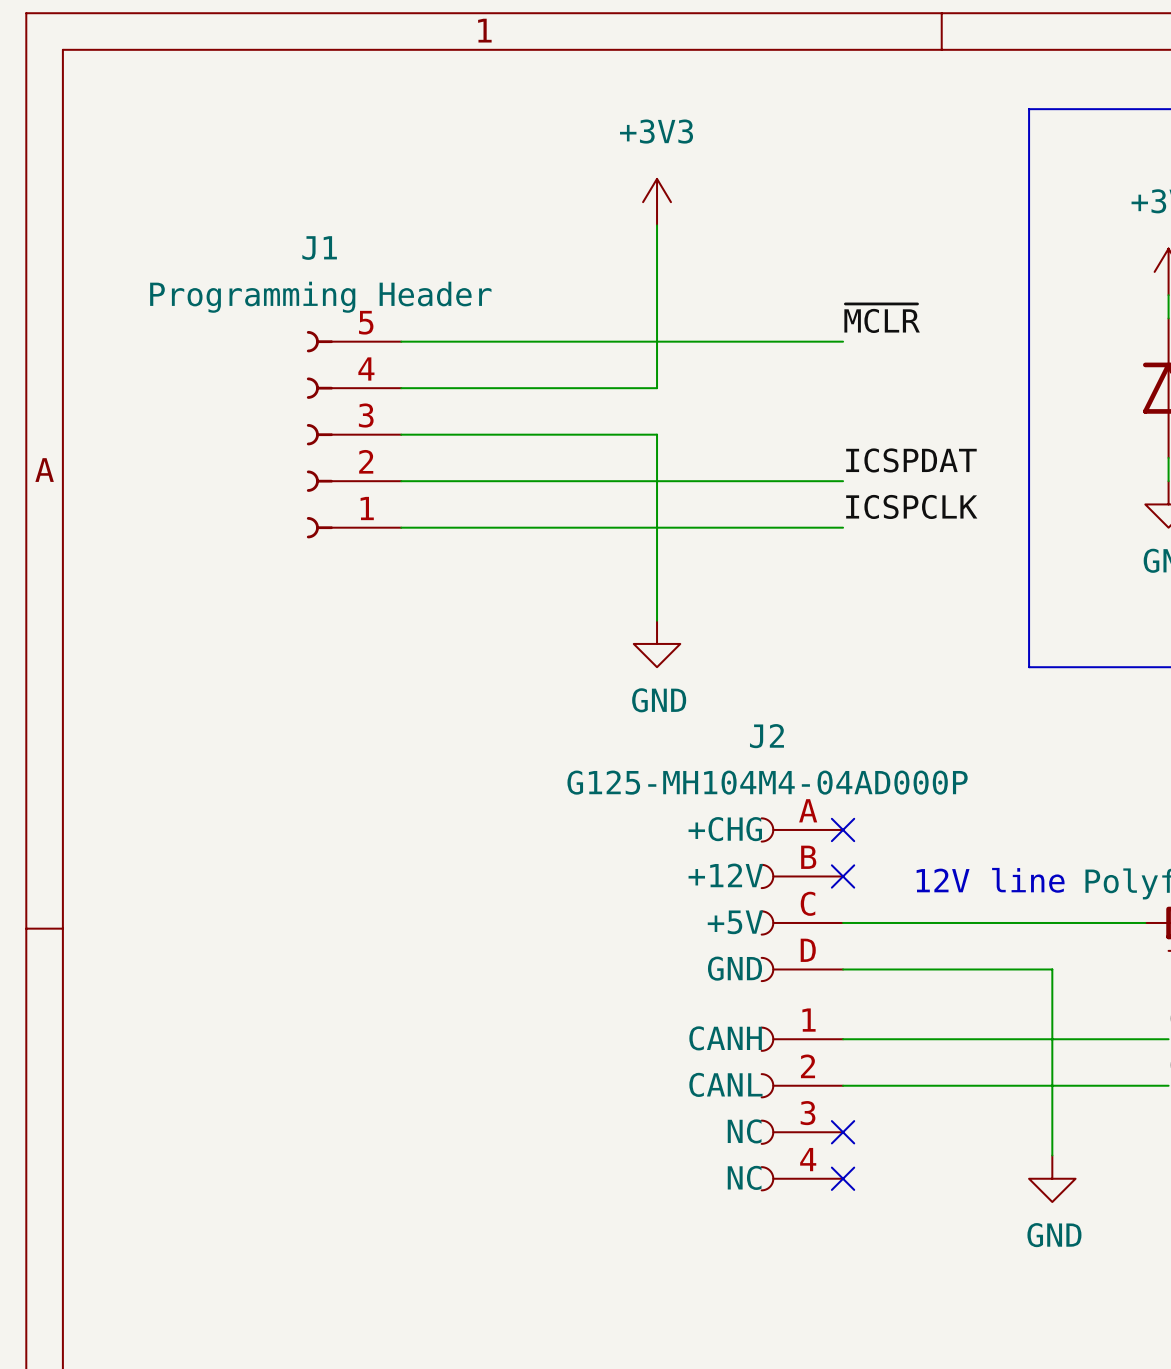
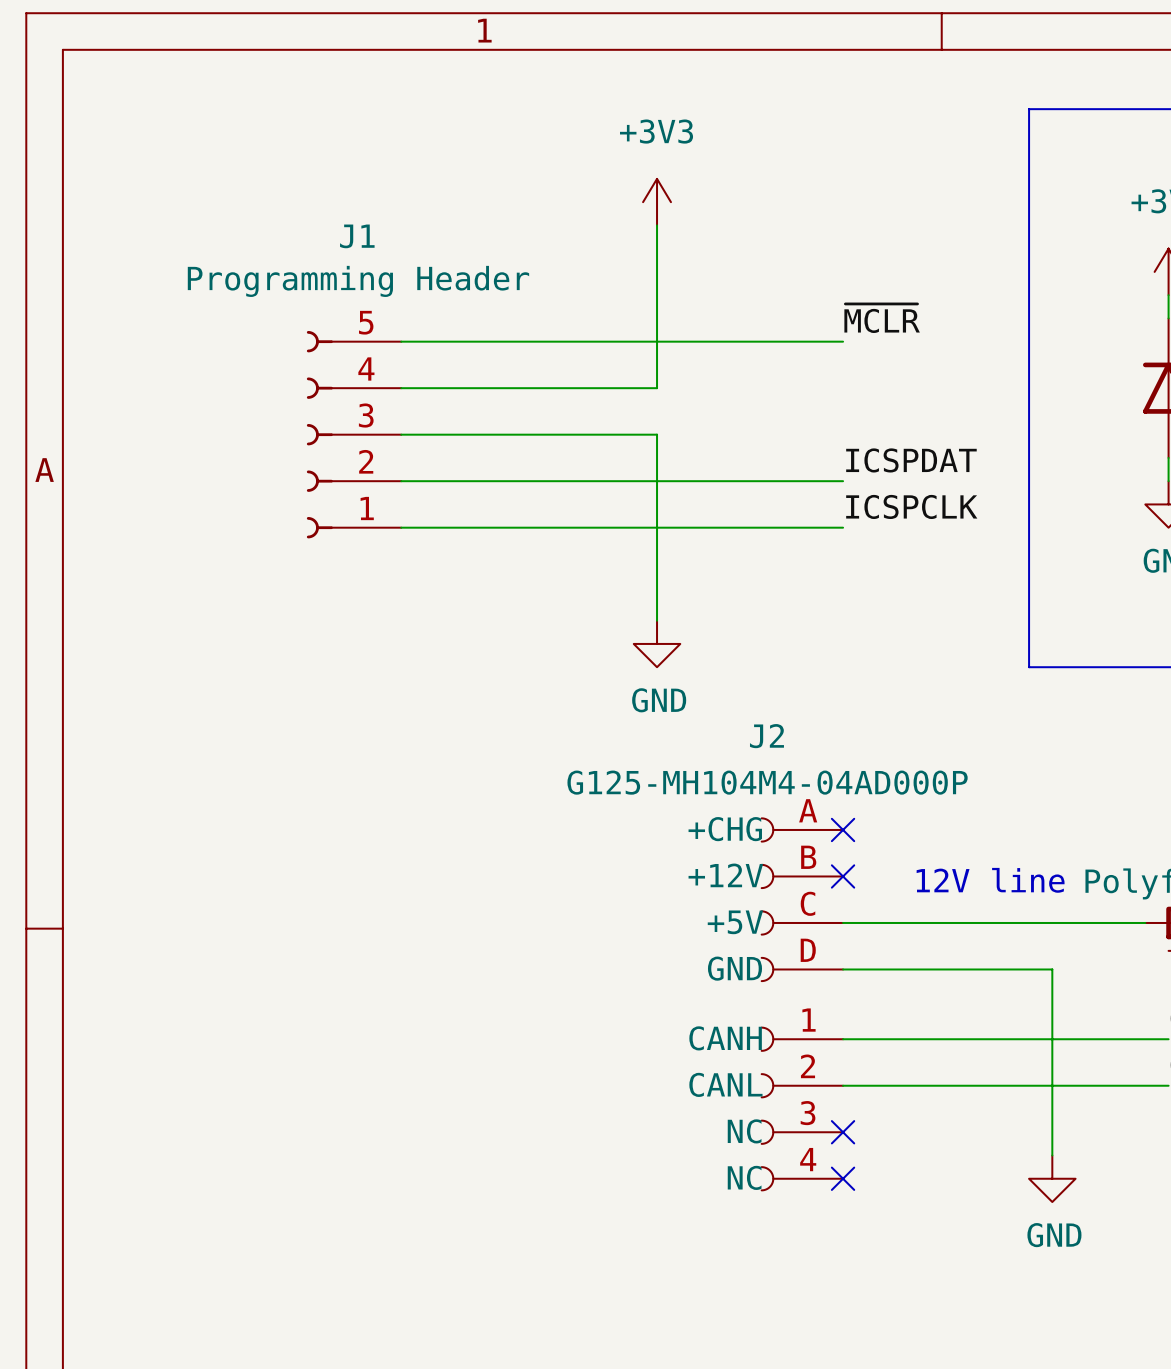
J1 name position: J1 (319, 248) -> J1 (357, 236)
J1 value position: Programming Header (320, 297) -> Programming Header (358, 281)

